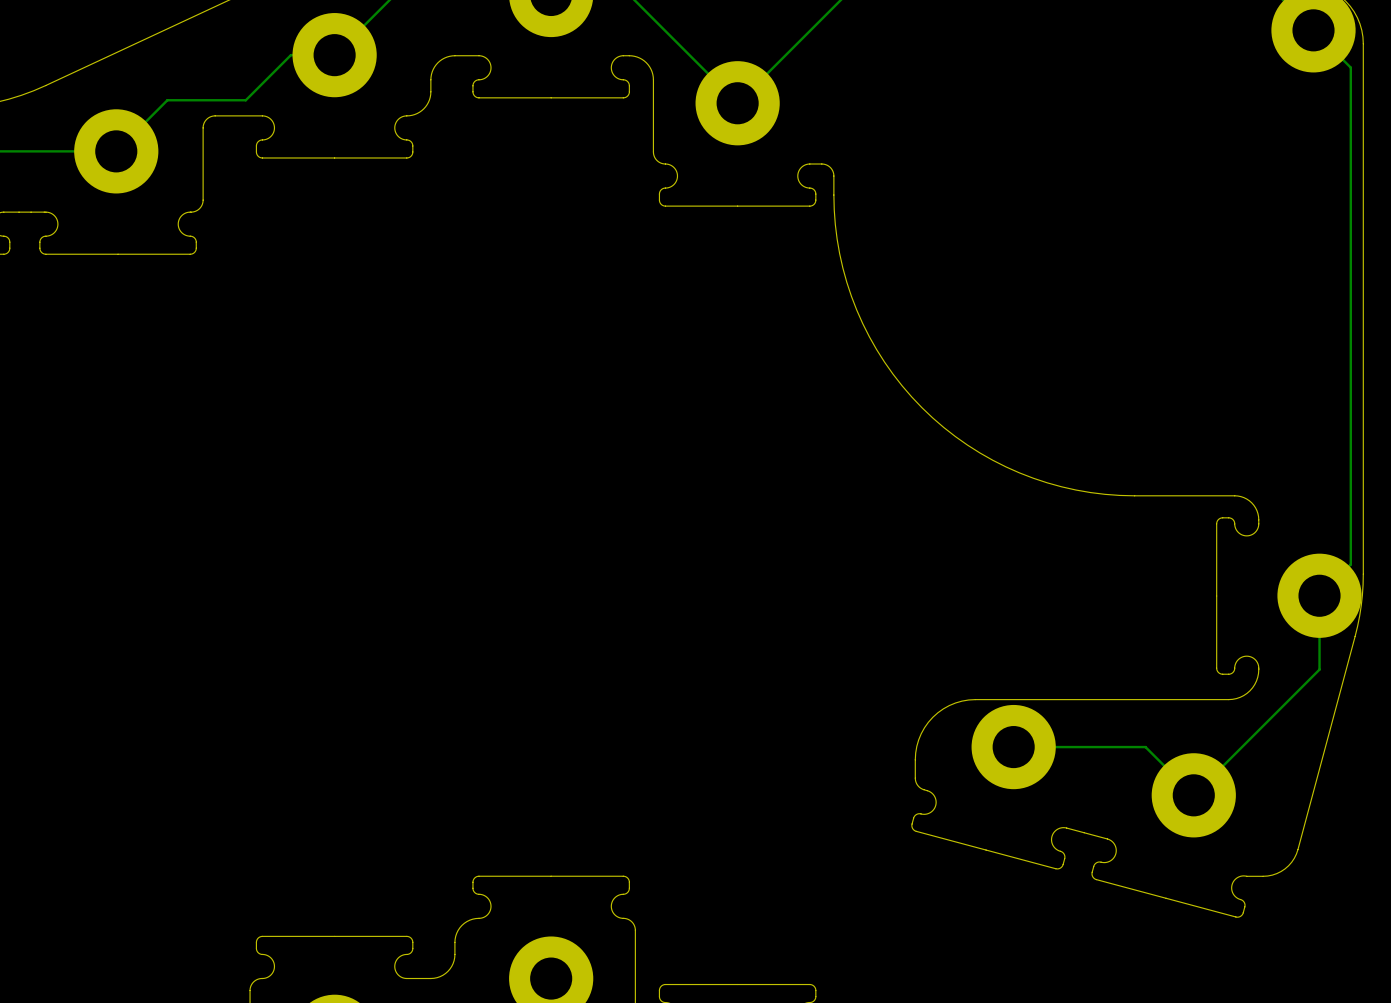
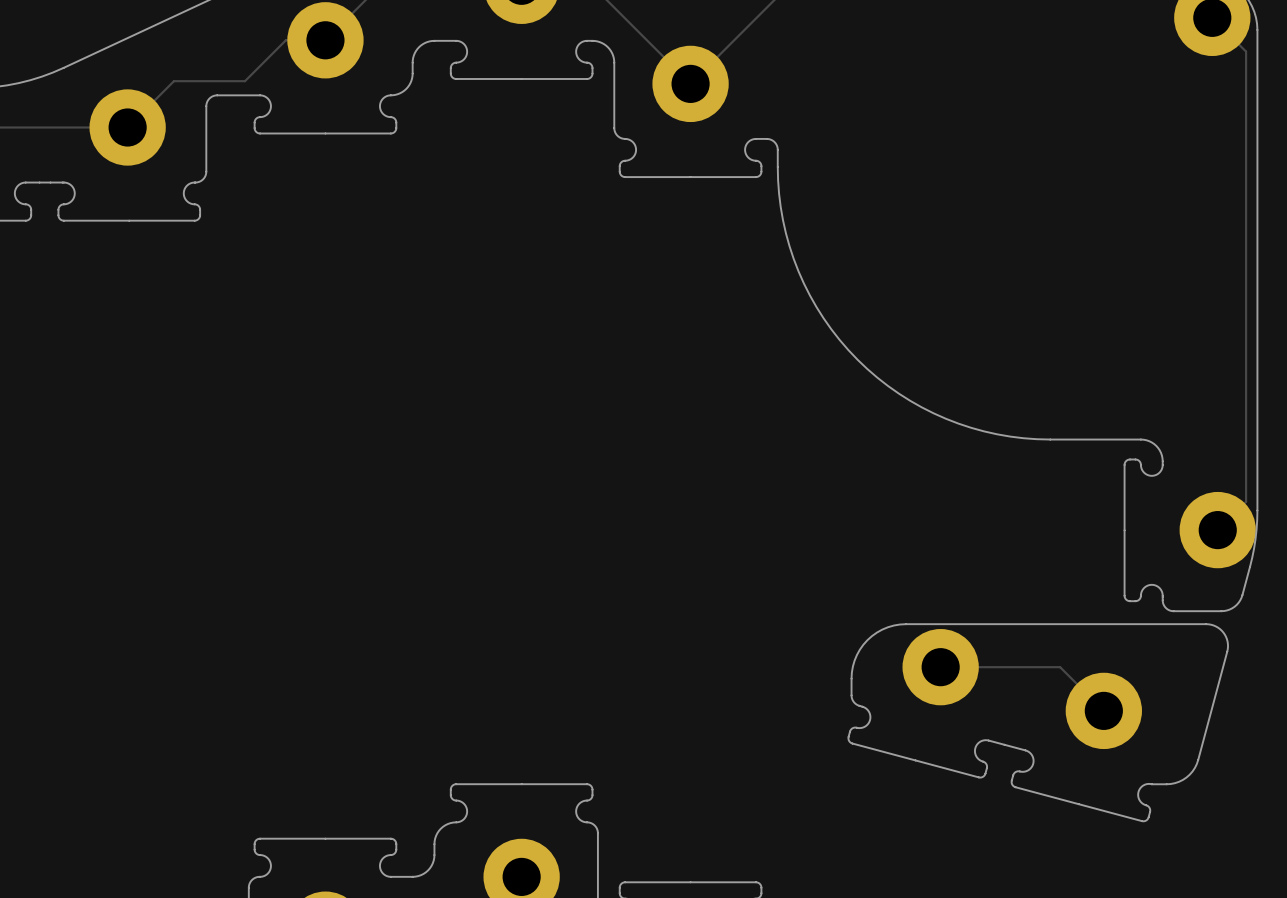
track: (1319, 595) (1319, 669) (1193, 795) -> none
board edge: (1355, 636) (1297, 849) -> (1135, 624) (1208, 624) (1220, 629) (1226, 636) (1227, 651) (1198, 760)
board edge: (1258, 669) (1256, 681) (1249, 690) (1240, 697) (1228, 699) -> (1162, 596) (1164, 606) (1171, 610) (1229, 609) (1236, 604) (1241, 597) (1249, 567)

